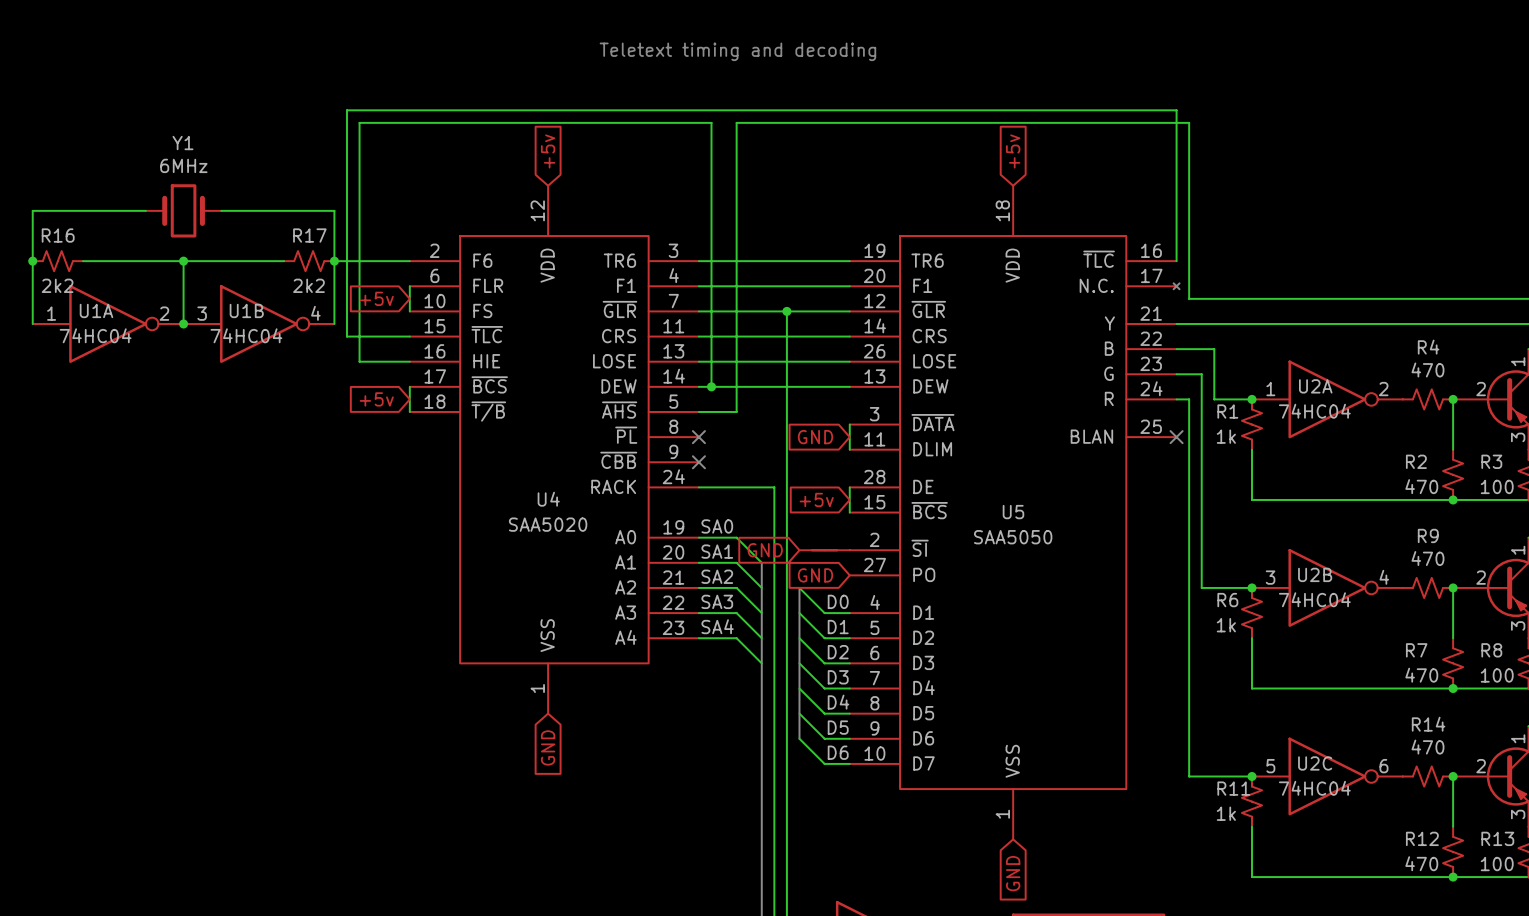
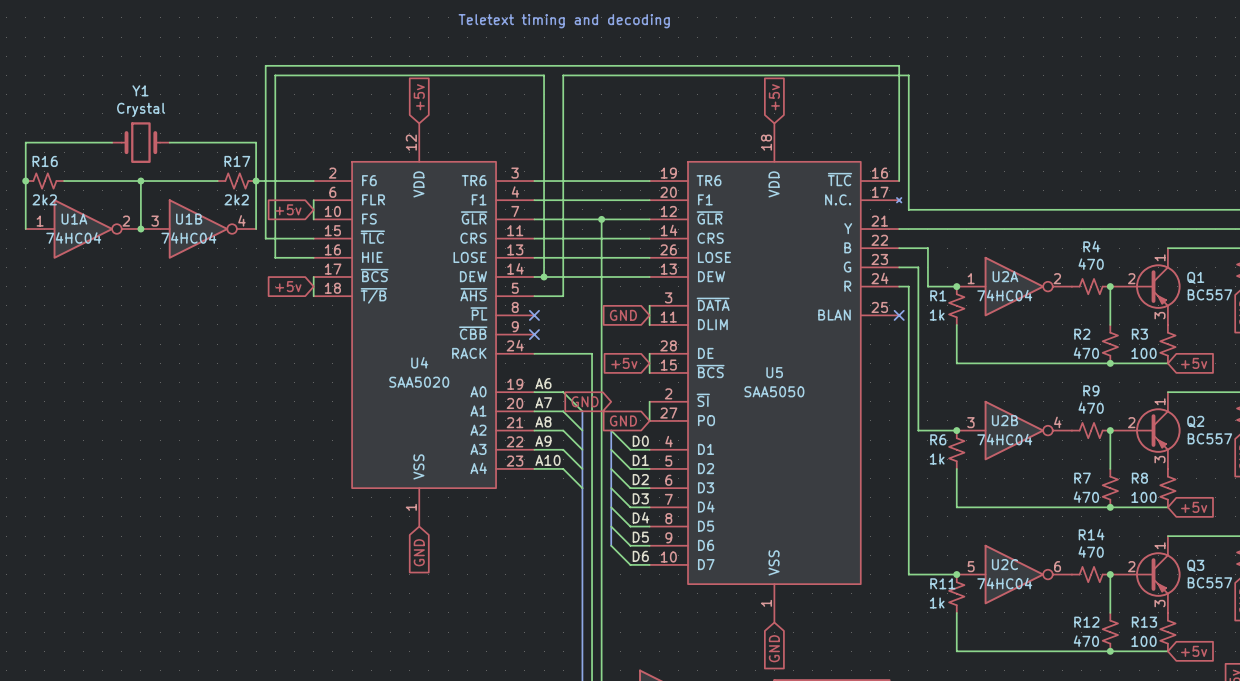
Y1 value: 6MHz (183, 165) -> Crystal (141, 109)
label: SA0 (717, 526) -> A6 (543, 383)
part: (824, 550) -> none
wire: none -> (649, 401) (649, 420)
label: SA1 (717, 551) -> A7 (543, 402)
label: SA2 (717, 576) -> A8 (543, 422)
label: SA3 (717, 601) -> A9 (543, 441)
label: SA4 (717, 626) -> A10 (547, 460)

